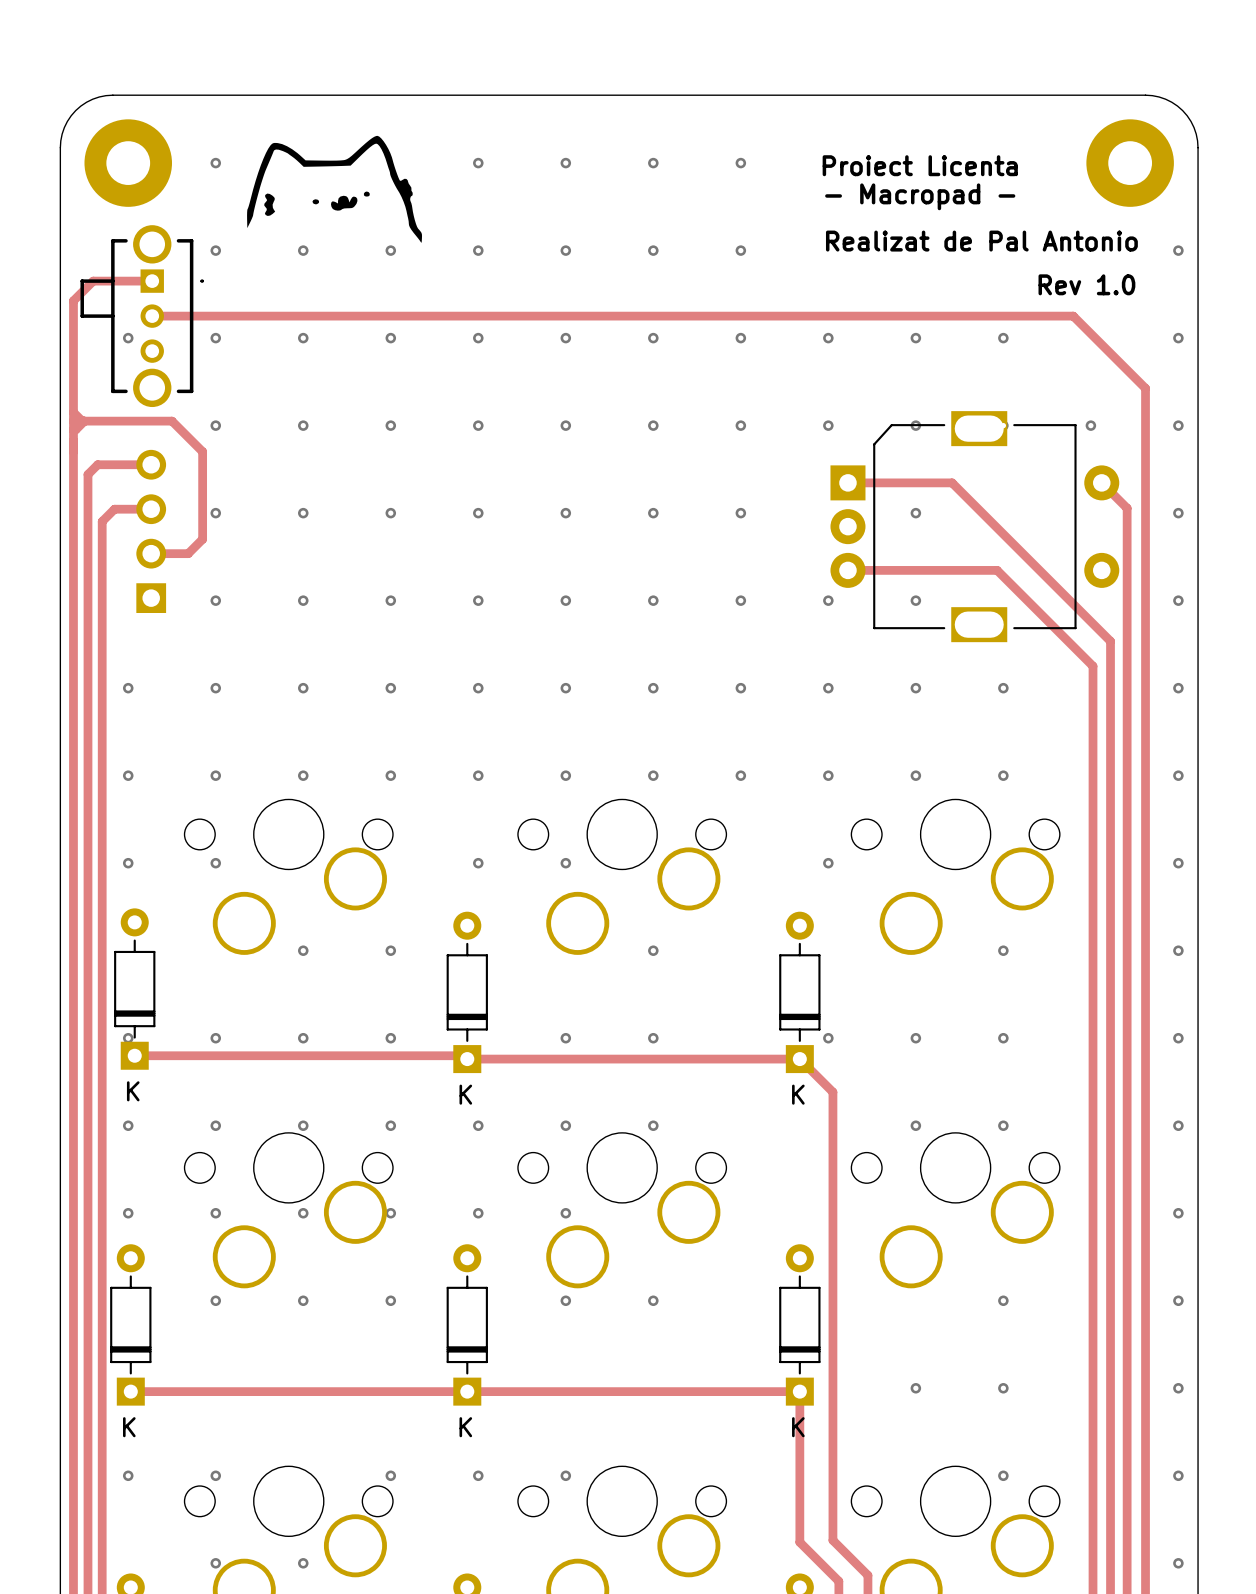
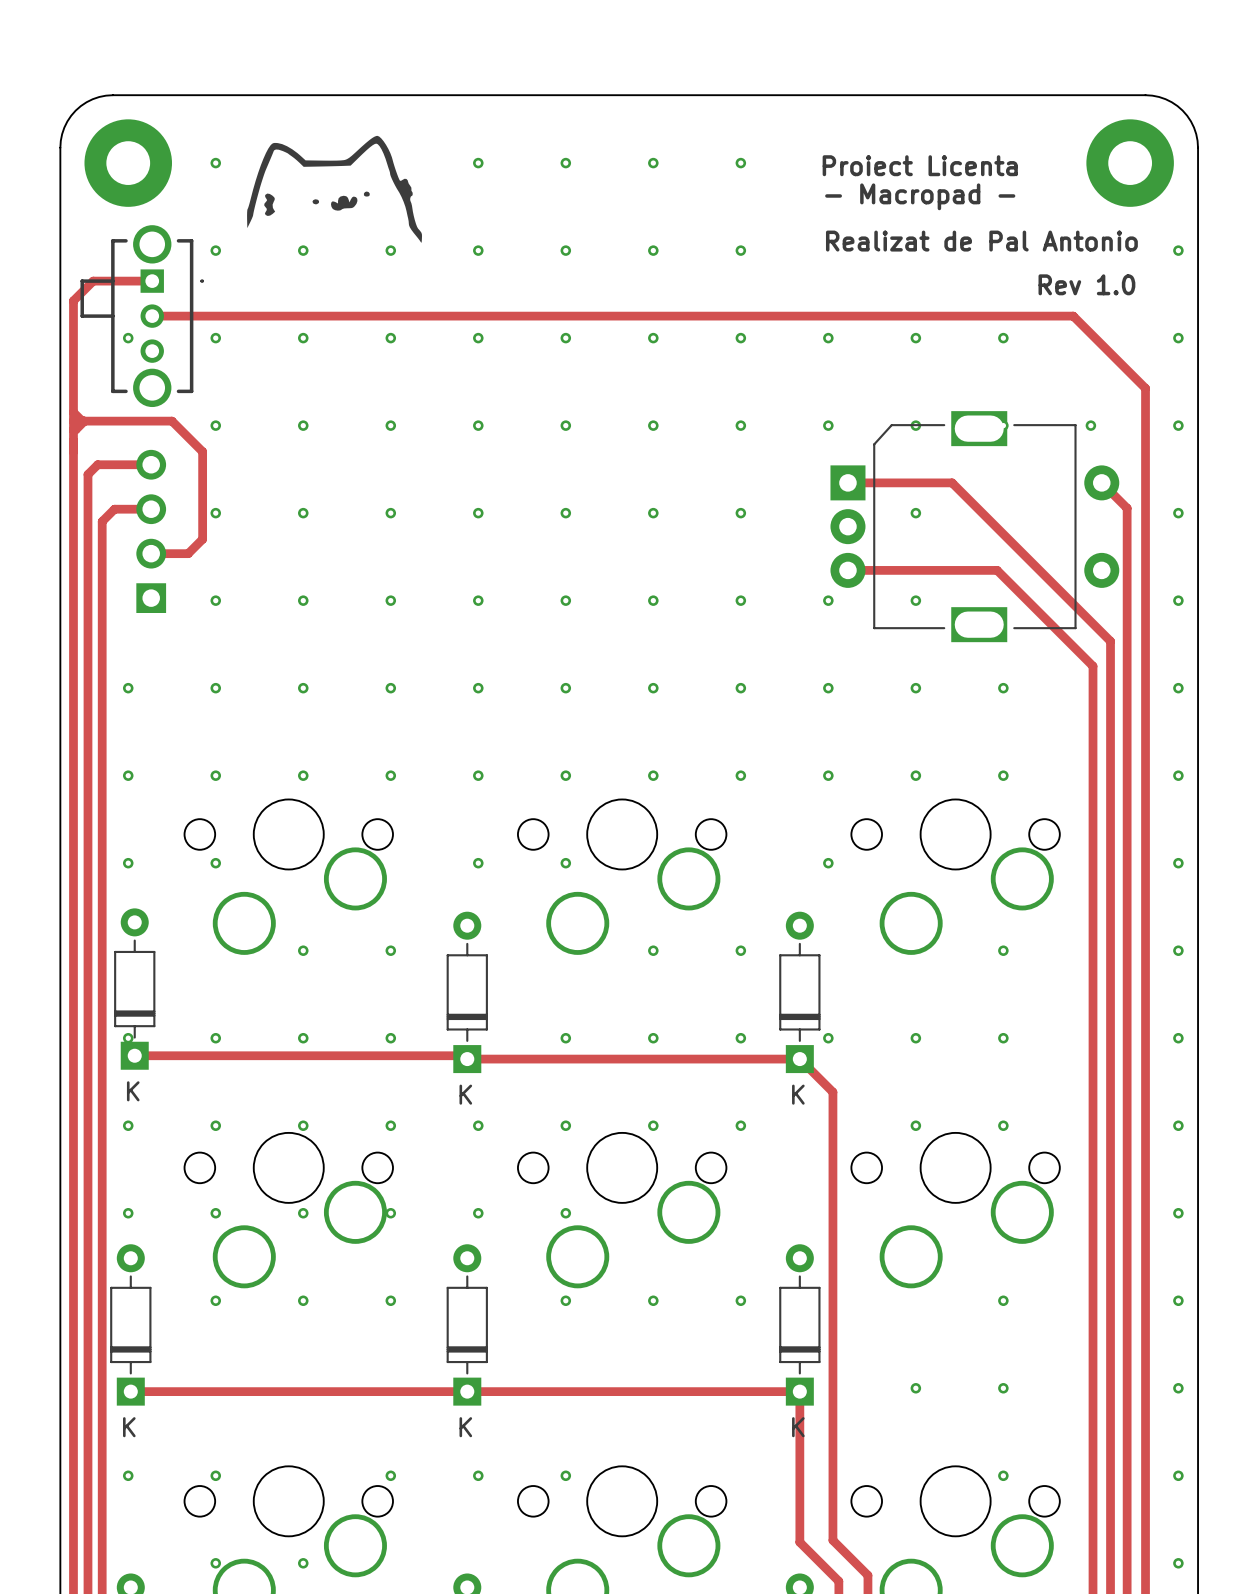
via: none -> (740, 950)
via: none -> (740, 1038)
via: none -> (740, 1125)
via: none -> (740, 1300)

